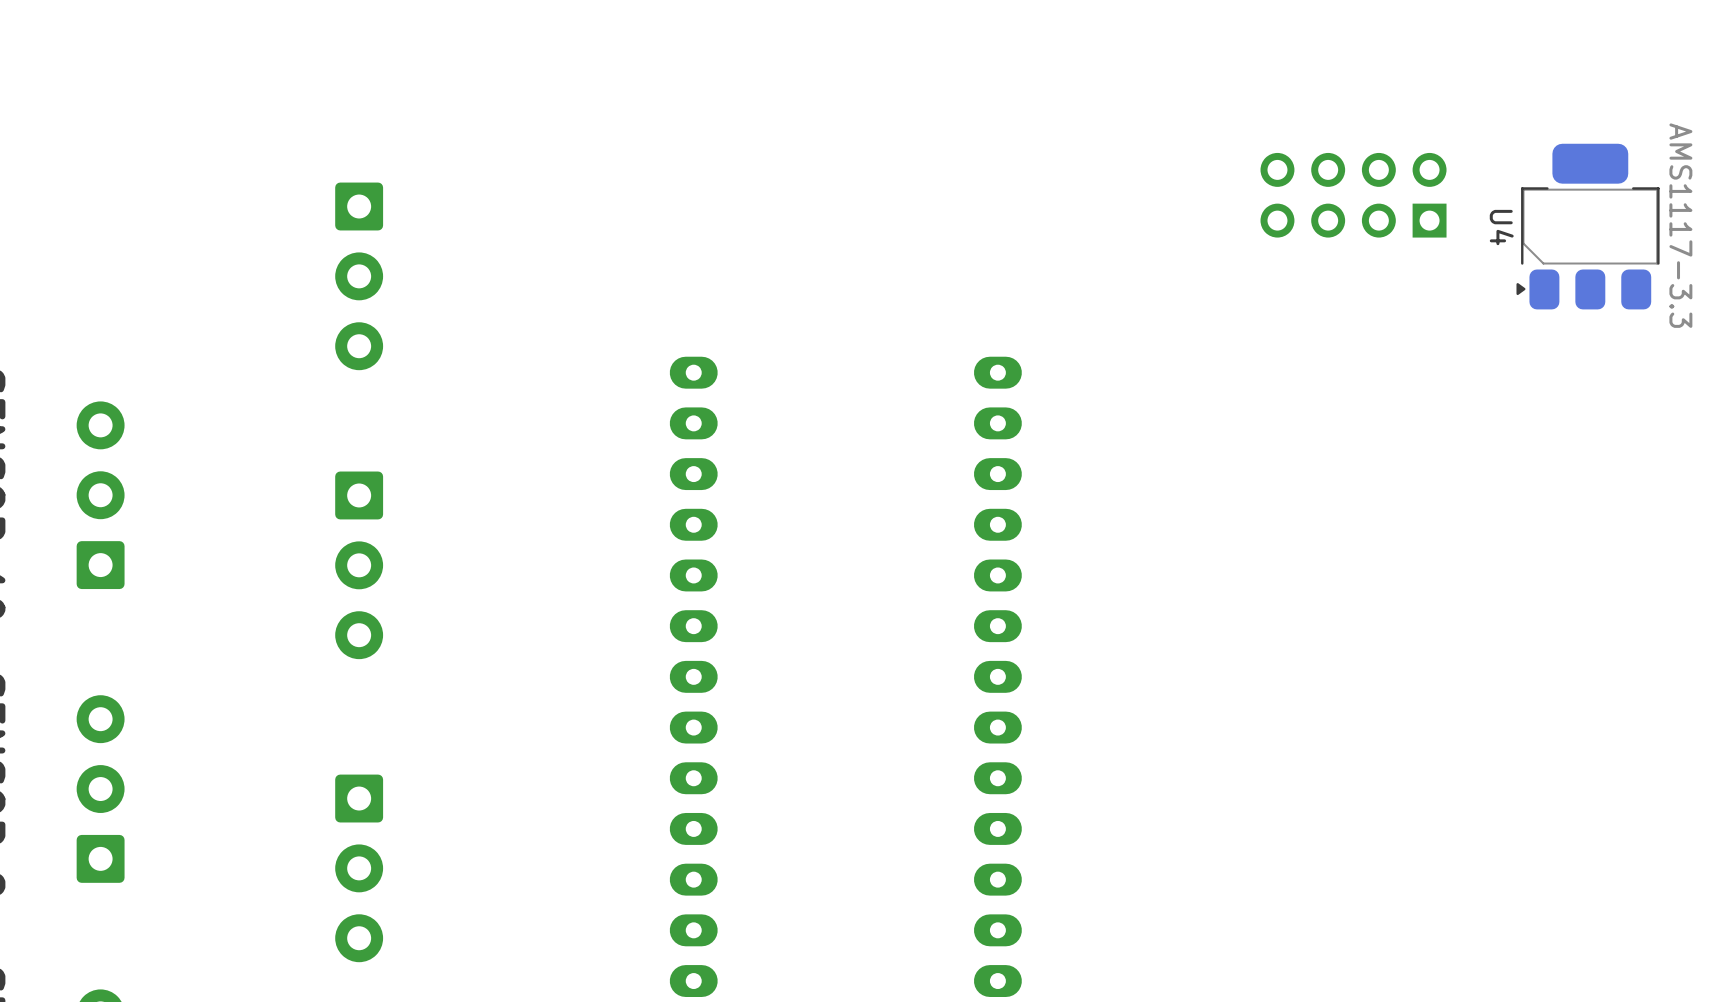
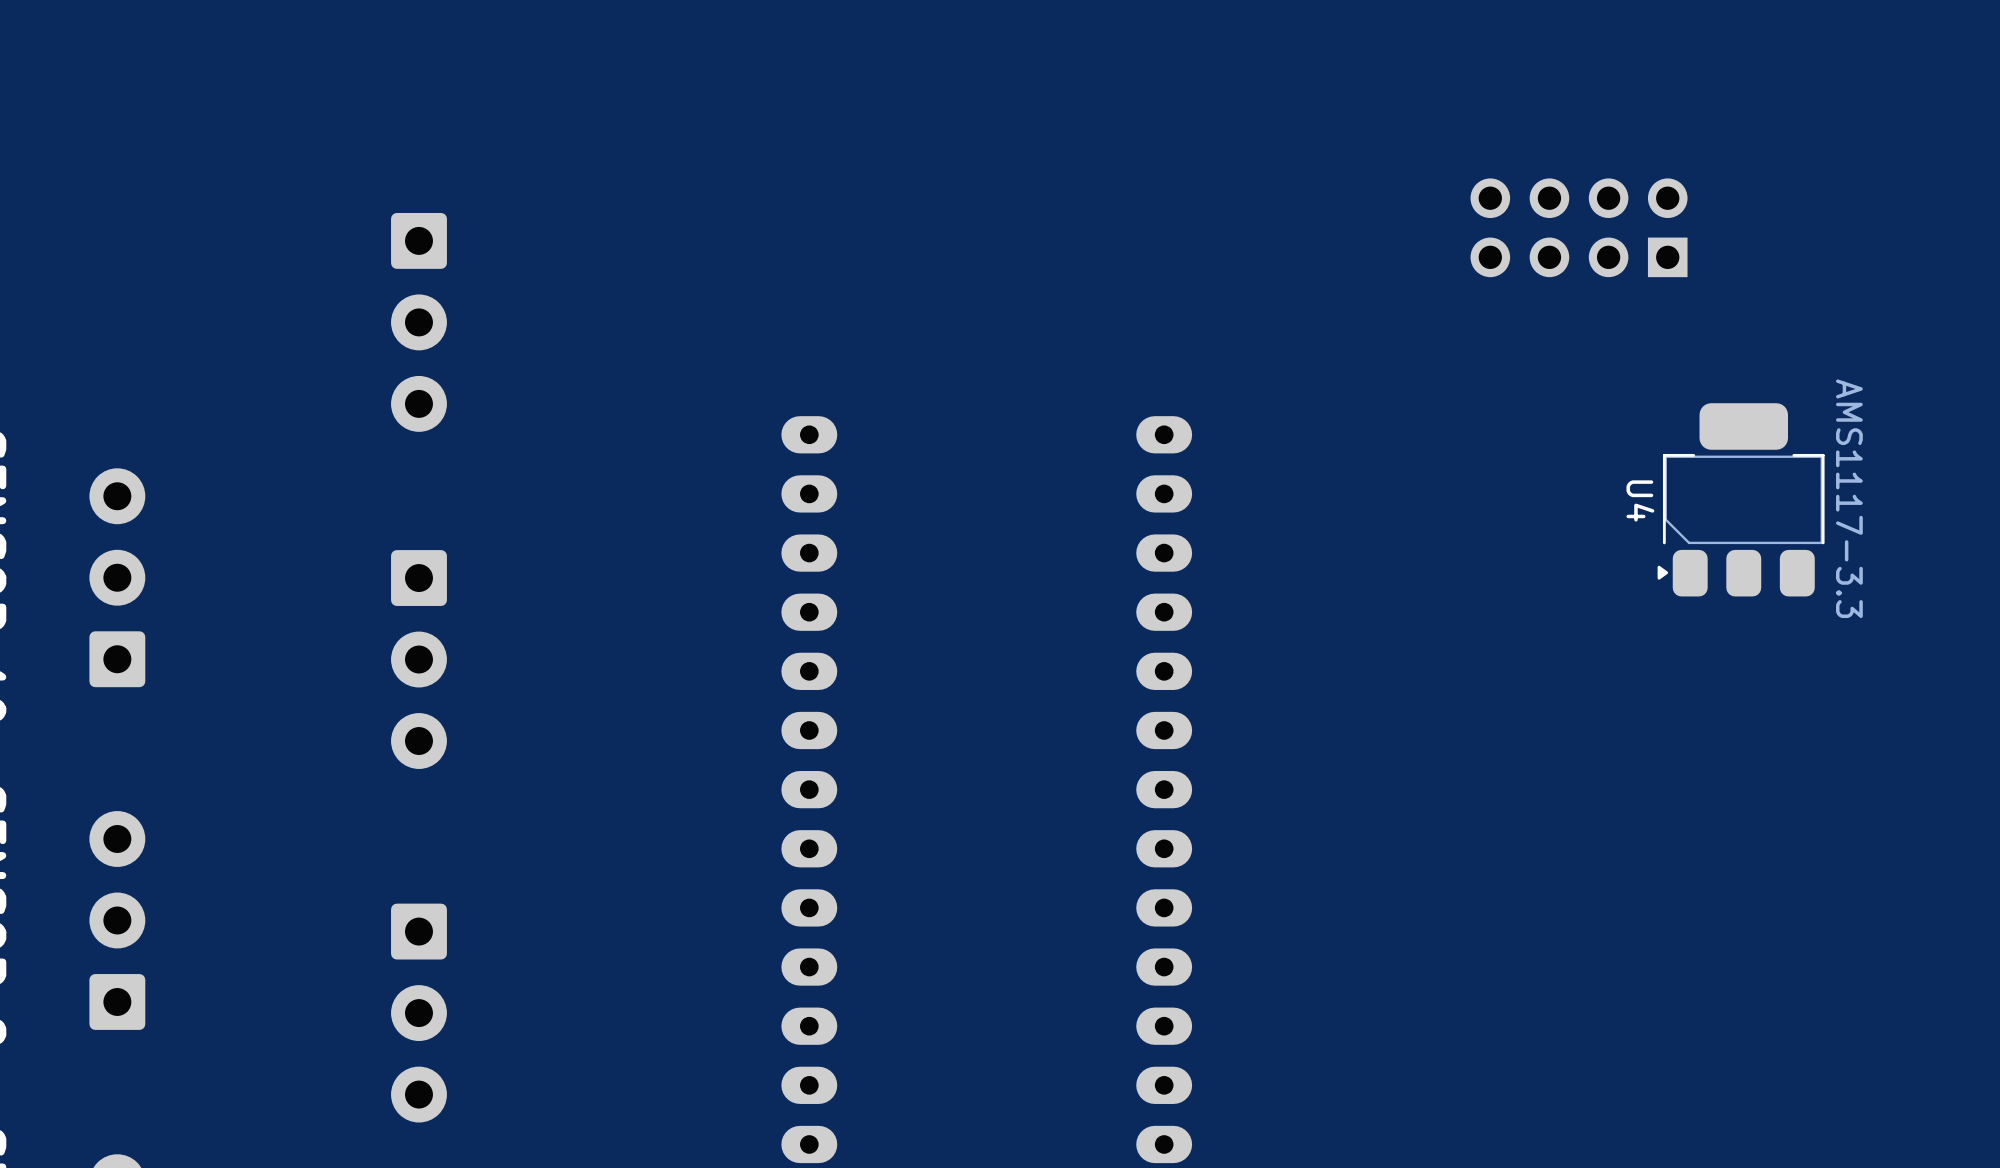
U4 position: (1588, 226) -> (1741, 499)

